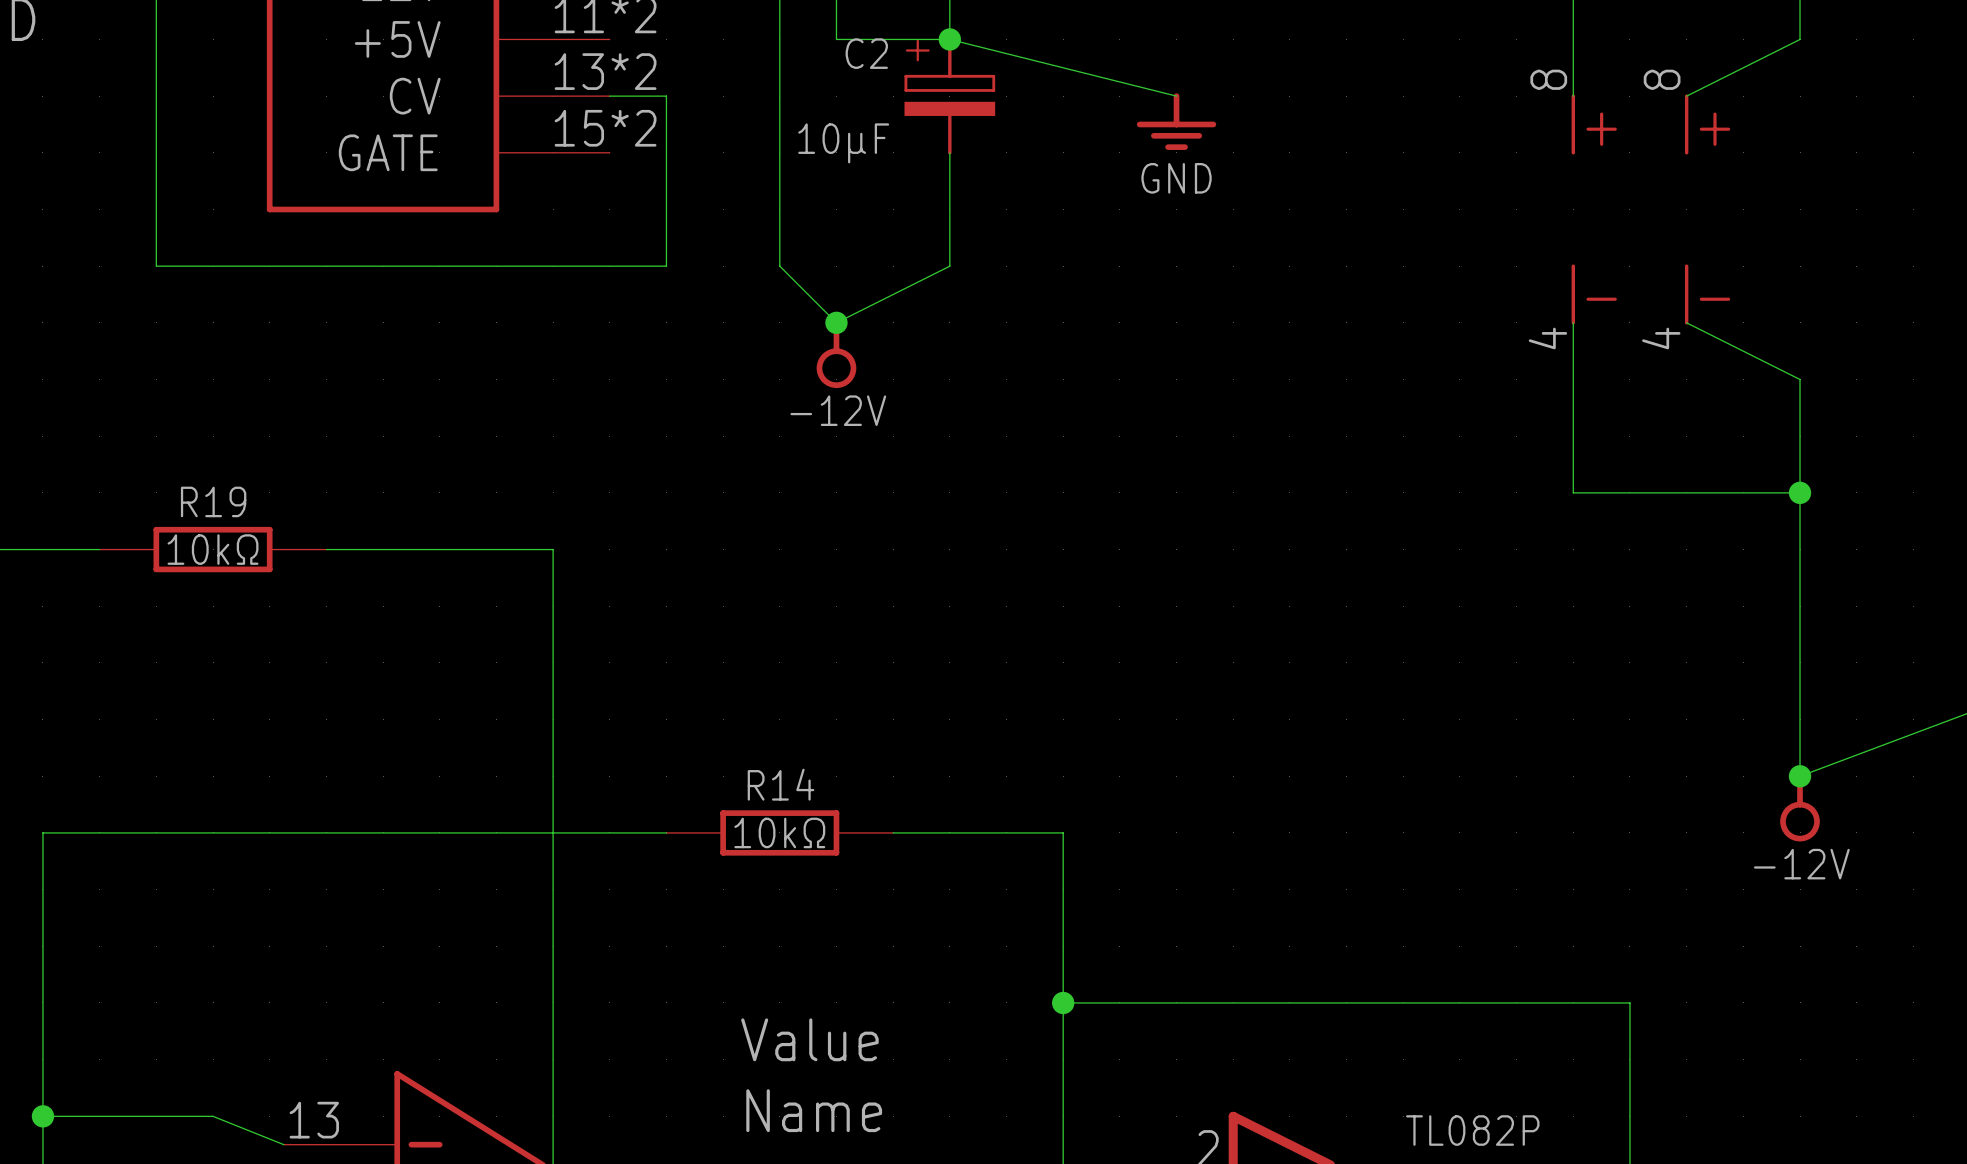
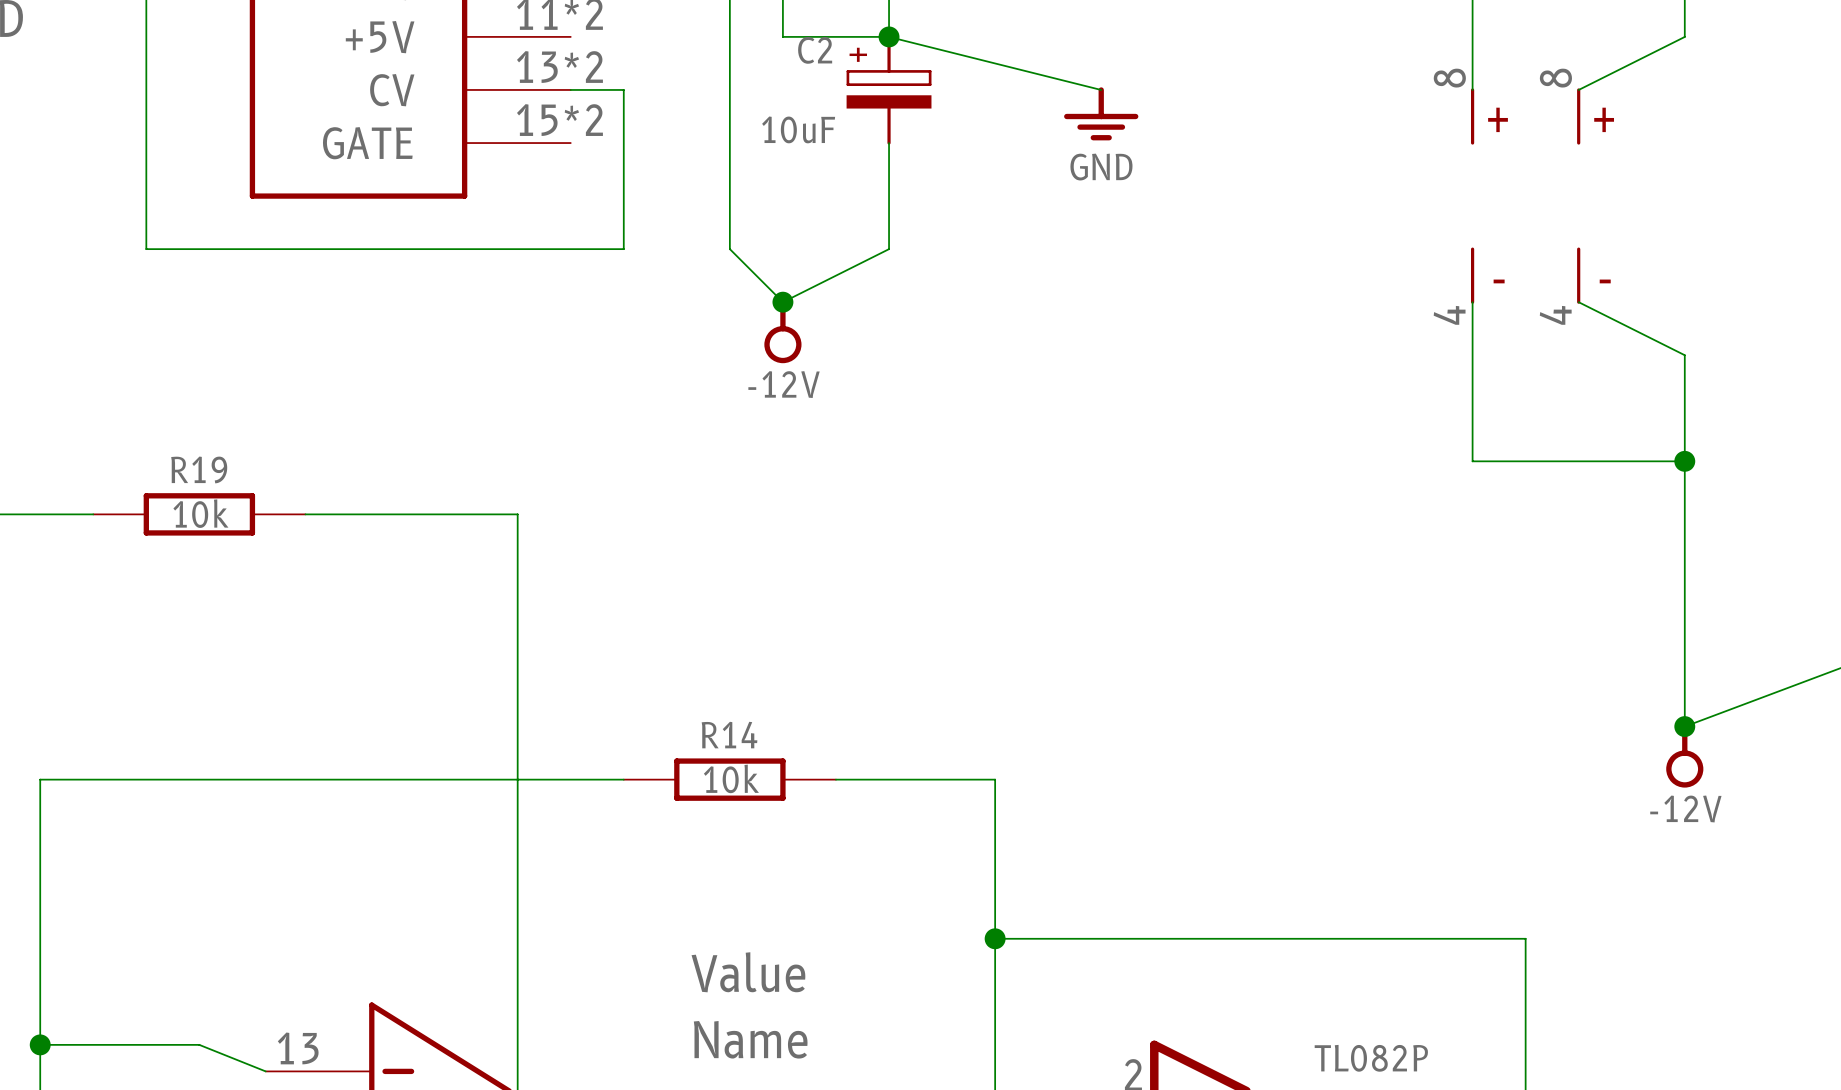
C2 value: 10μF (843, 143) -> 10uF (798, 129)
R19 value: 10kΩ (213, 549) -> 10k (200, 513)
R14 value: 10kΩ (779, 832) -> 10k (731, 778)

